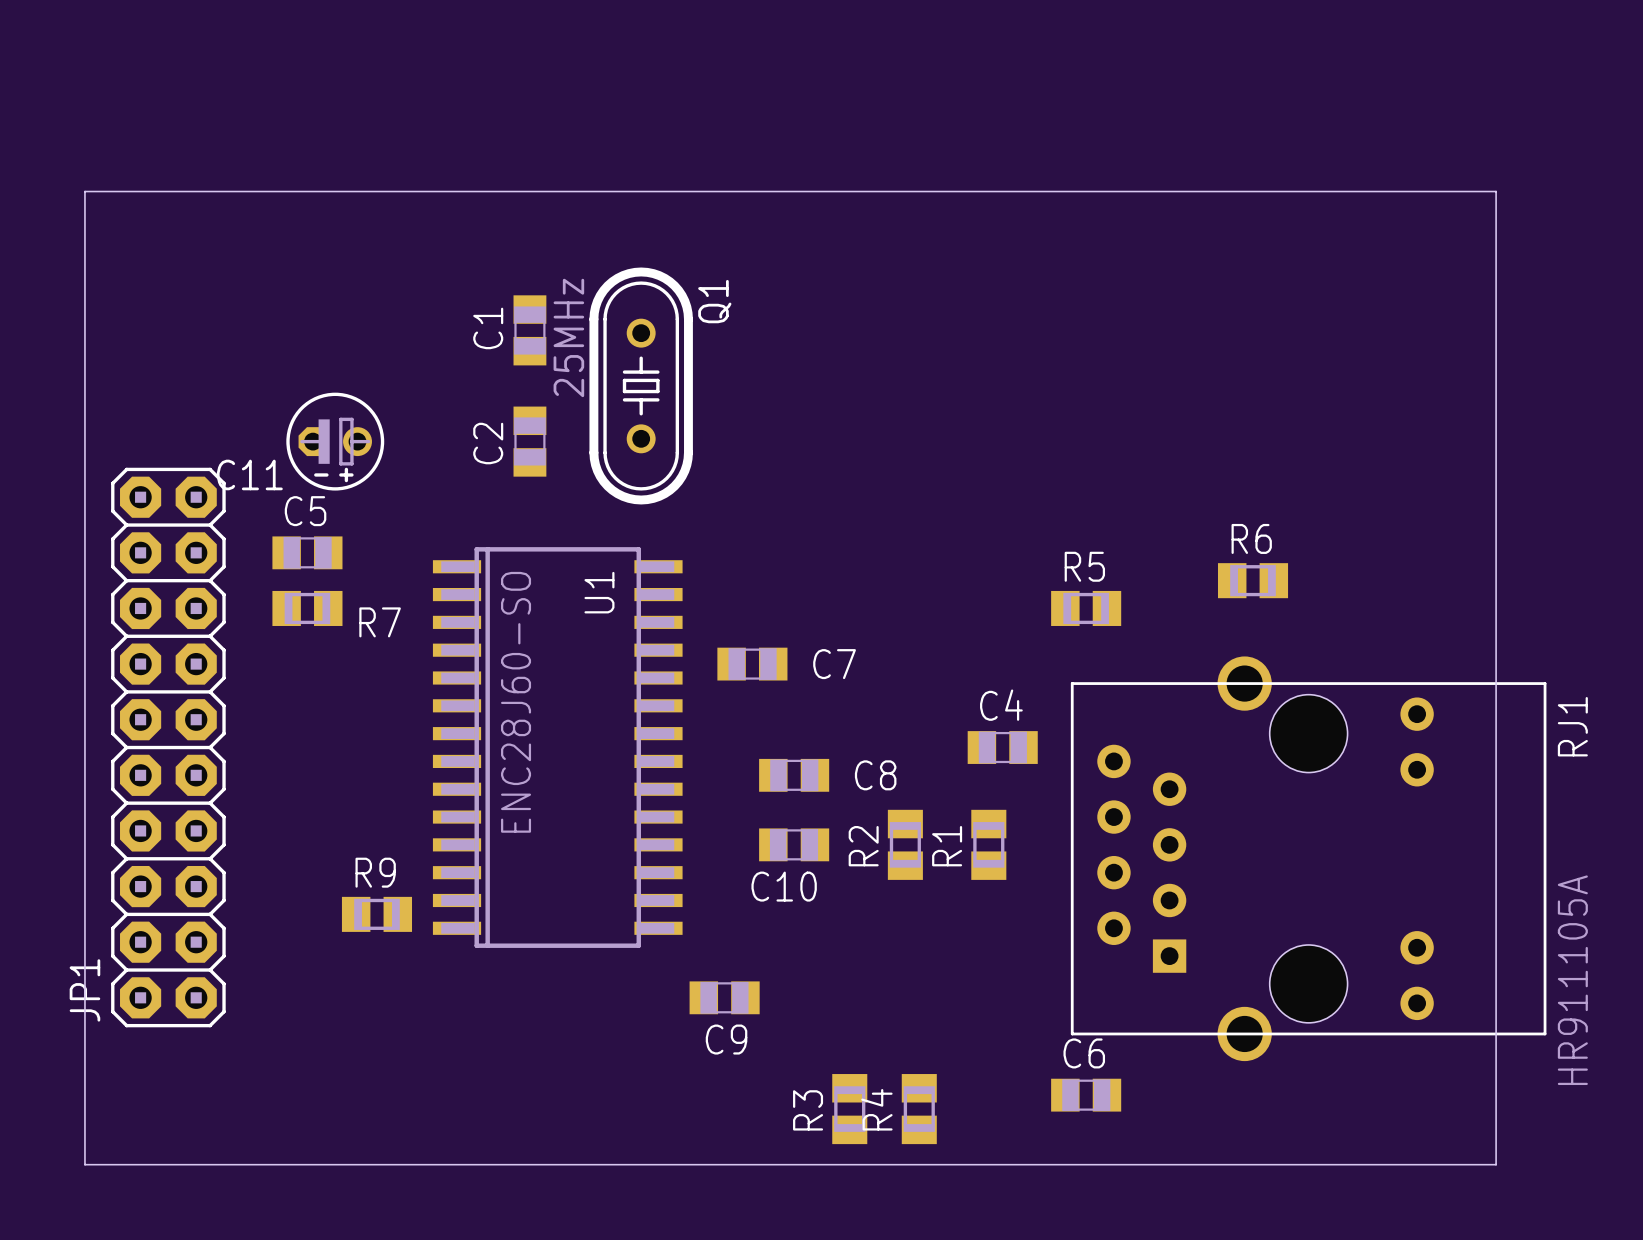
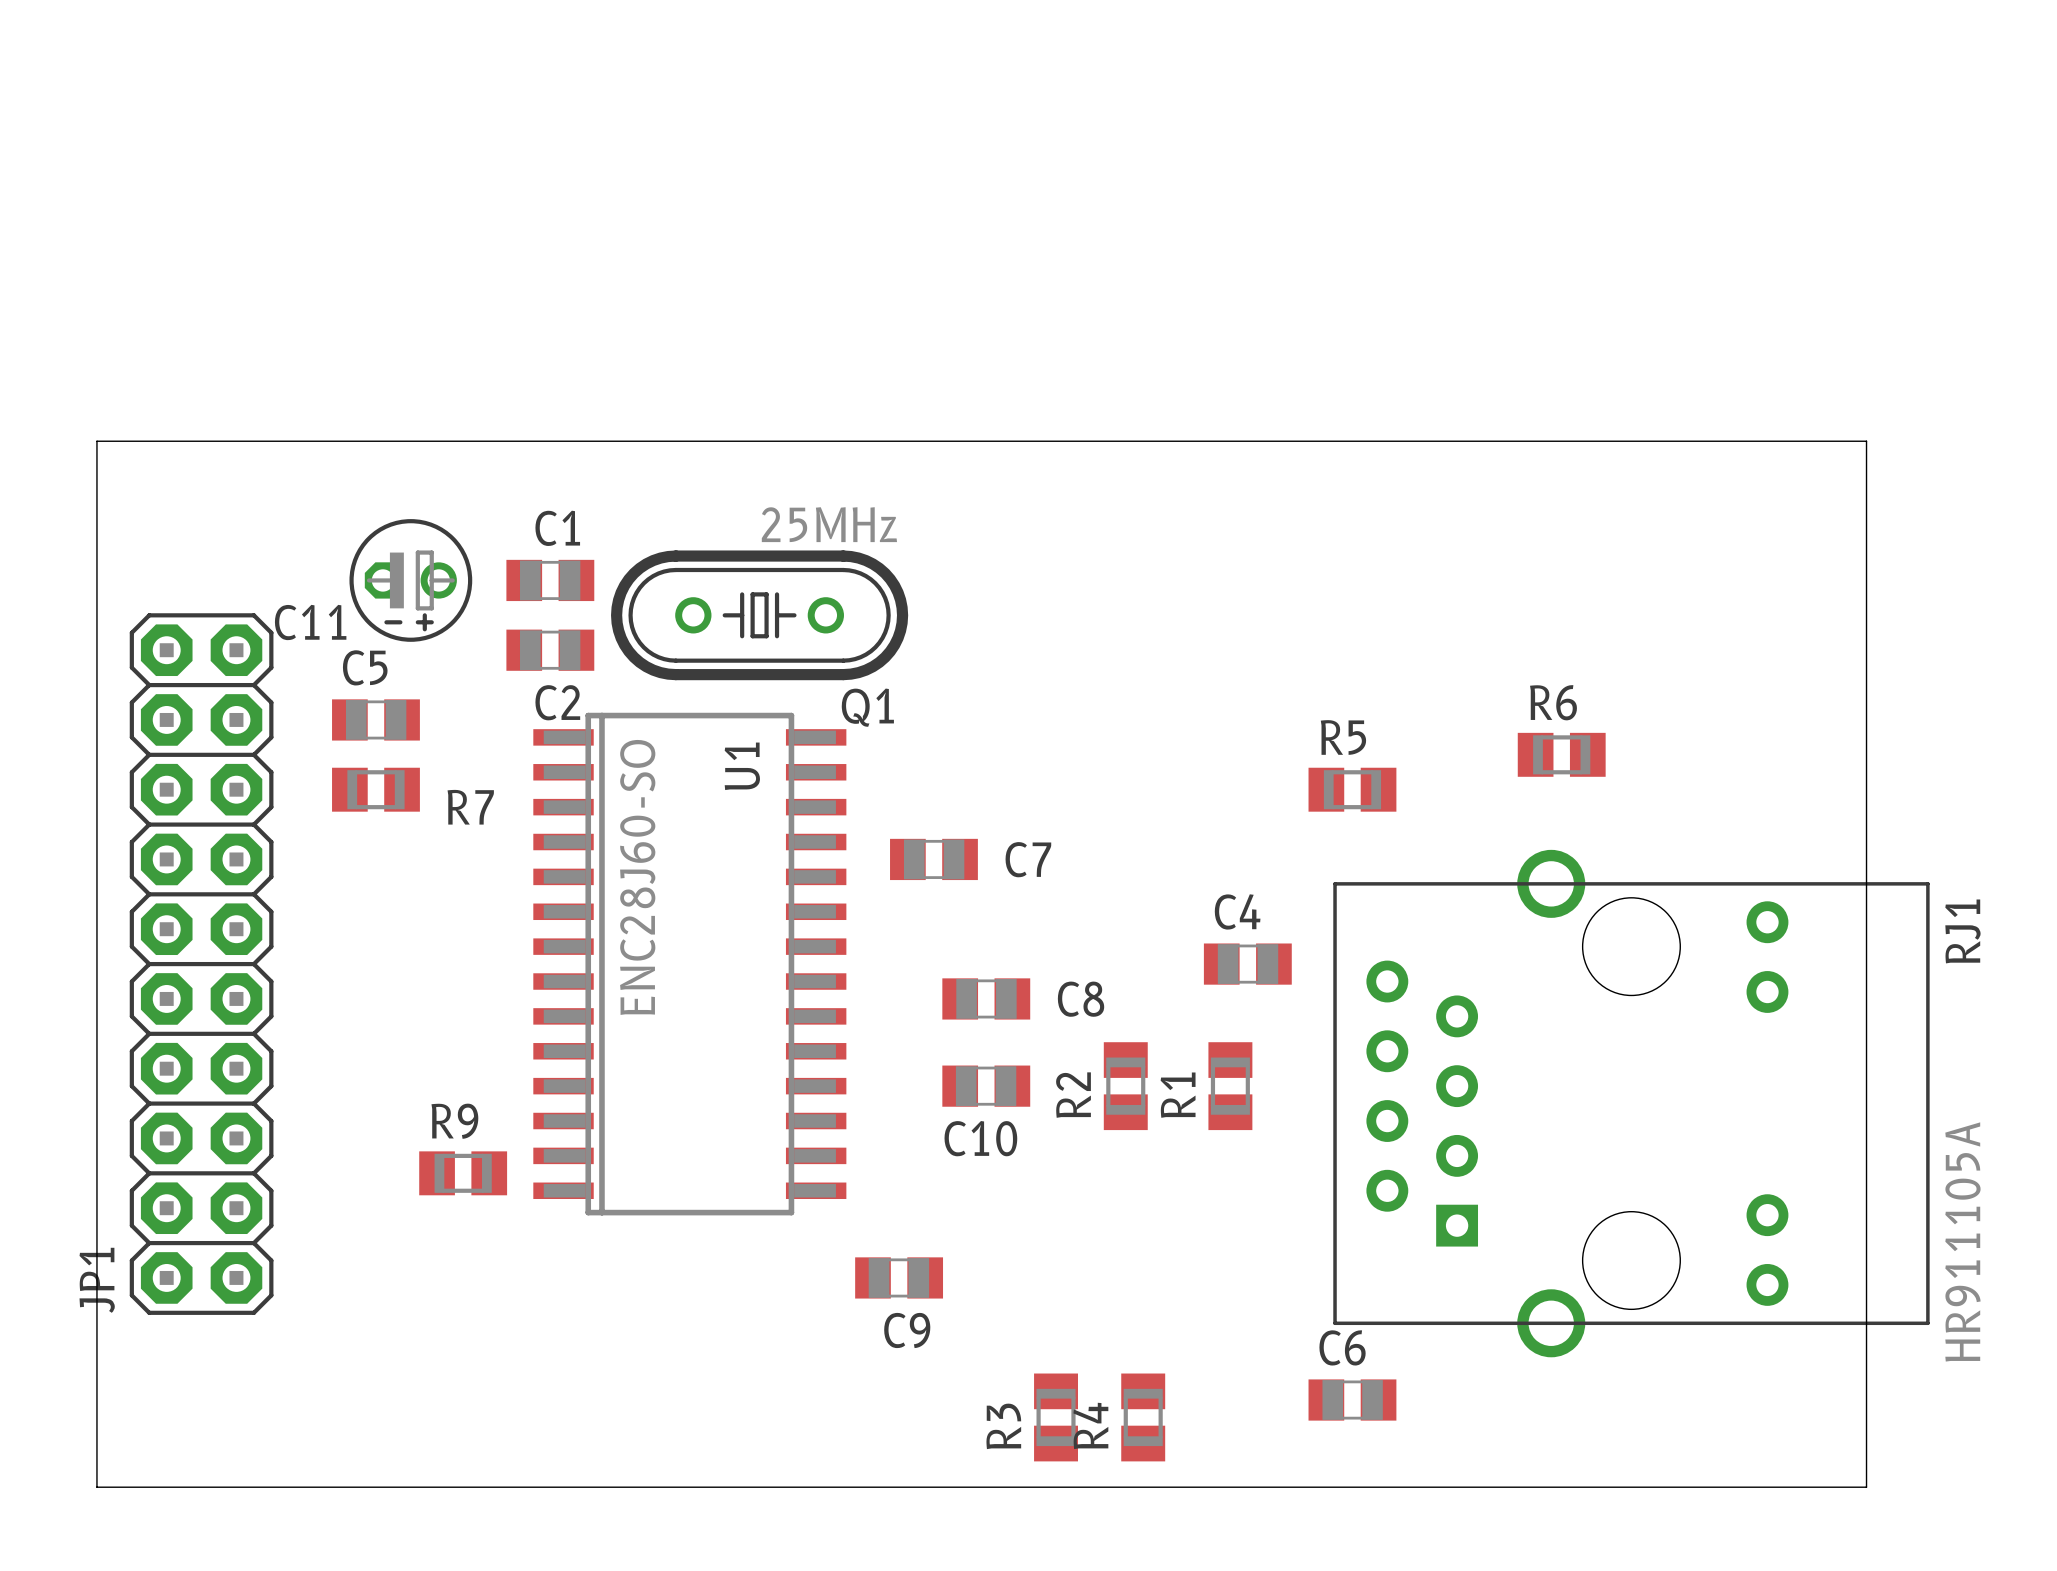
board edge: (84, 330) (84, 191) (1496, 191) (1496, 330) -> (96, 441) (1866, 441)
C1 rotation: 0° (529, 330) -> 90° clockwise (550, 580)
C1 position: (529, 330) -> (550, 580)
Q1 rotation: 0° (641, 385) -> 90° clockwise (759, 615)
C2 rotation: 0° (529, 441) -> 90° clockwise (550, 650)
C2 position: (529, 441) -> (550, 650)
C2 name position: C2 (488, 443) -> C2 (557, 702)

